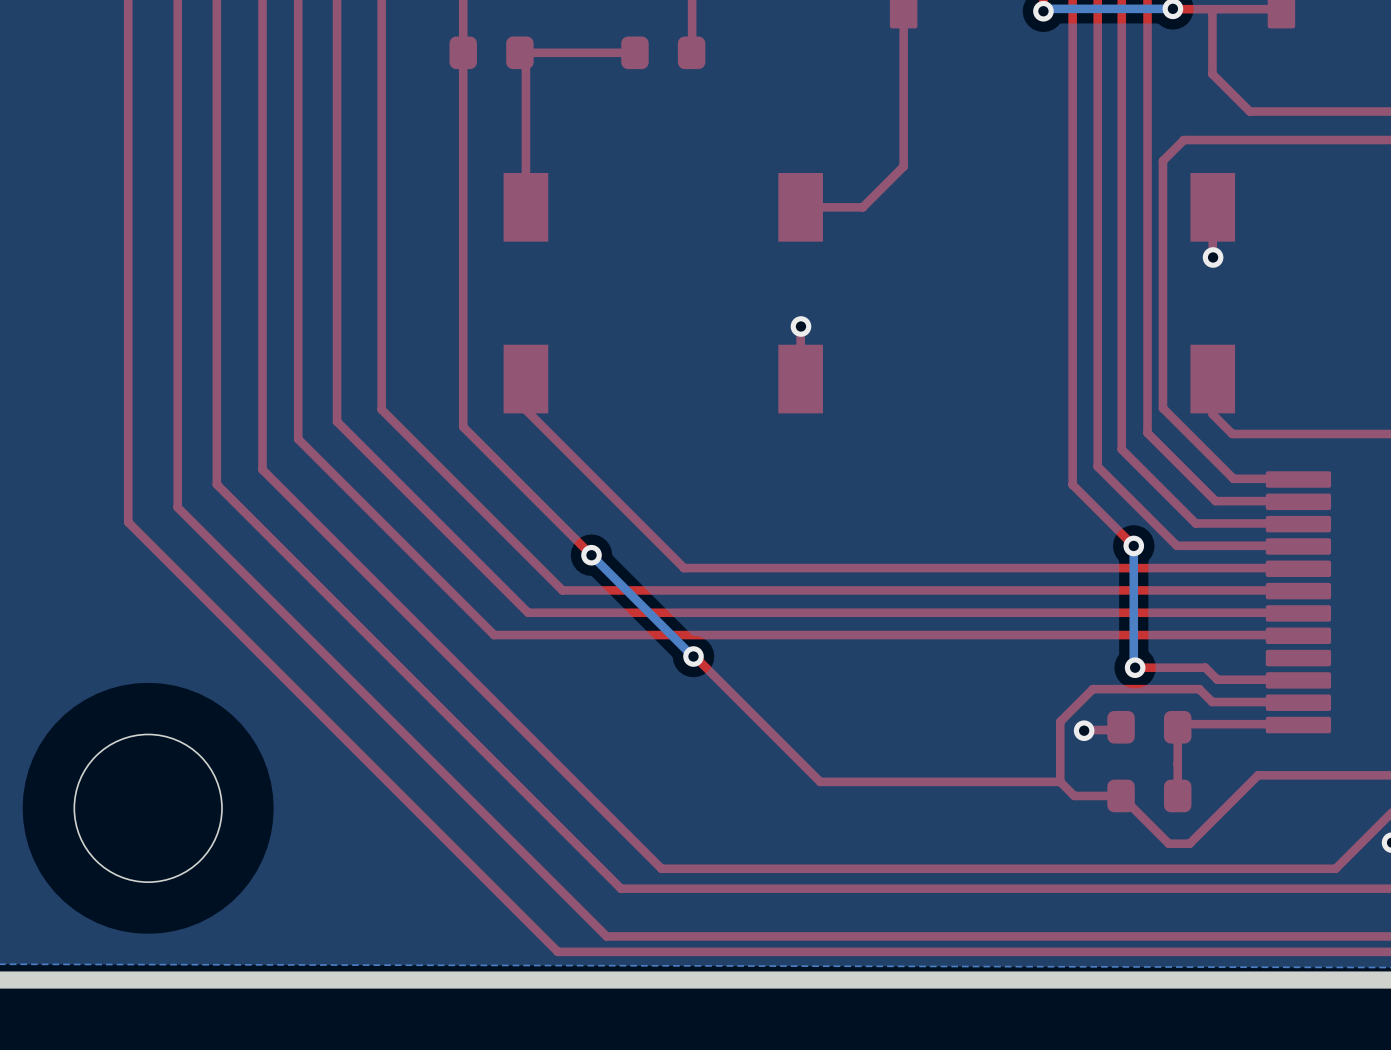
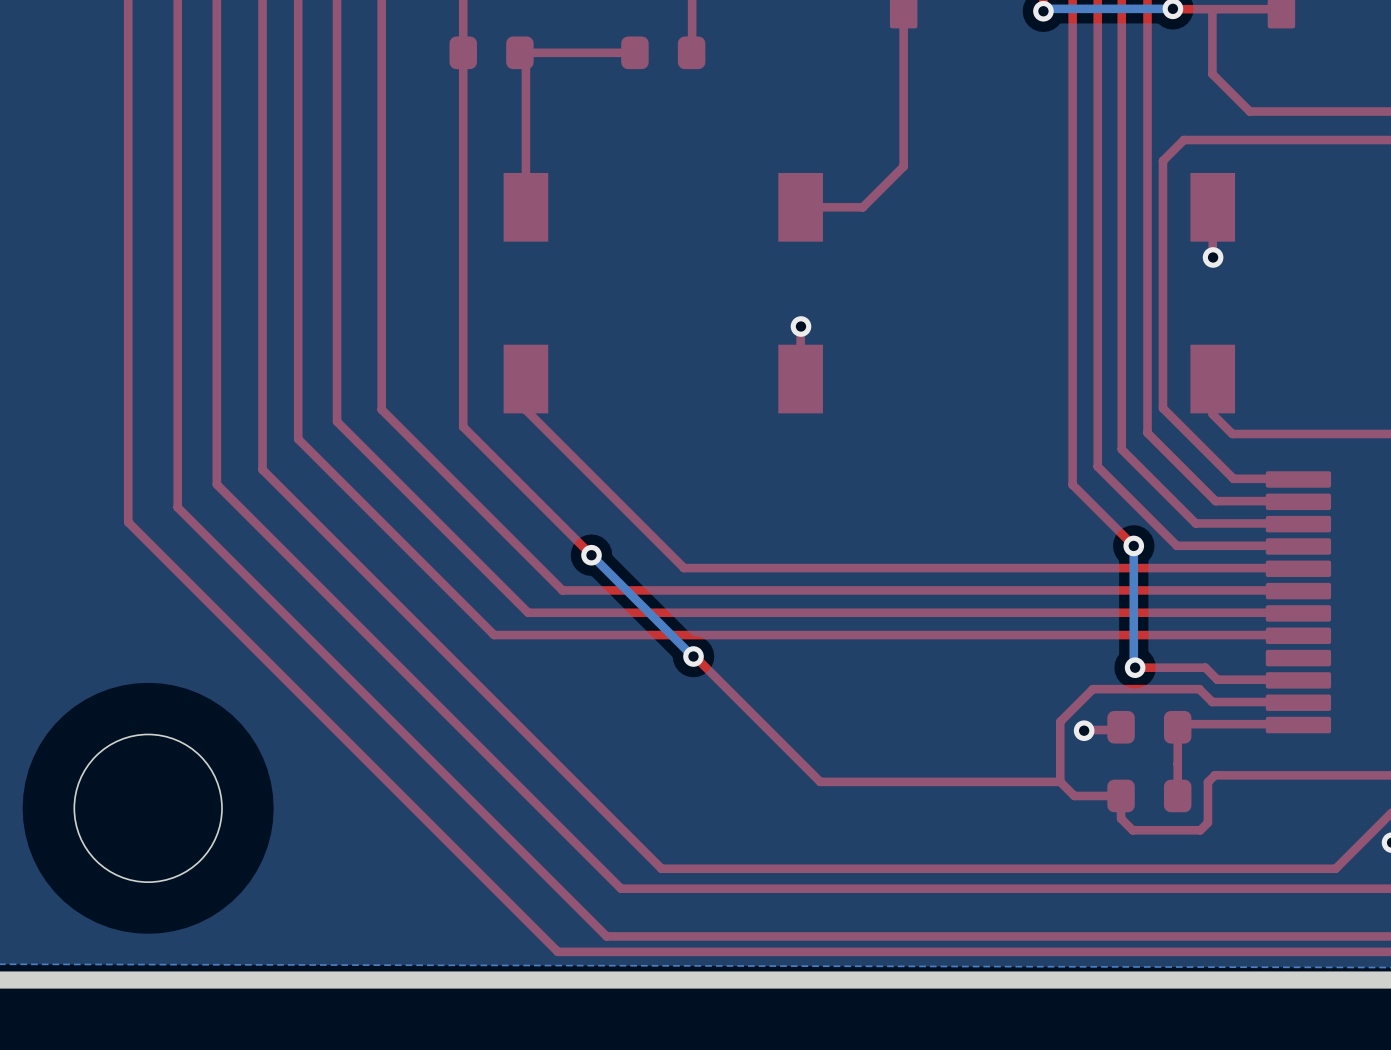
top track: (1258, 775) (1189, 843) (1168, 843) (1121, 795) -> (1258, 775) (1214, 775) (1207, 782) (1207, 822) (1200, 830) (1132, 830) (1121, 818) (1121, 795)

